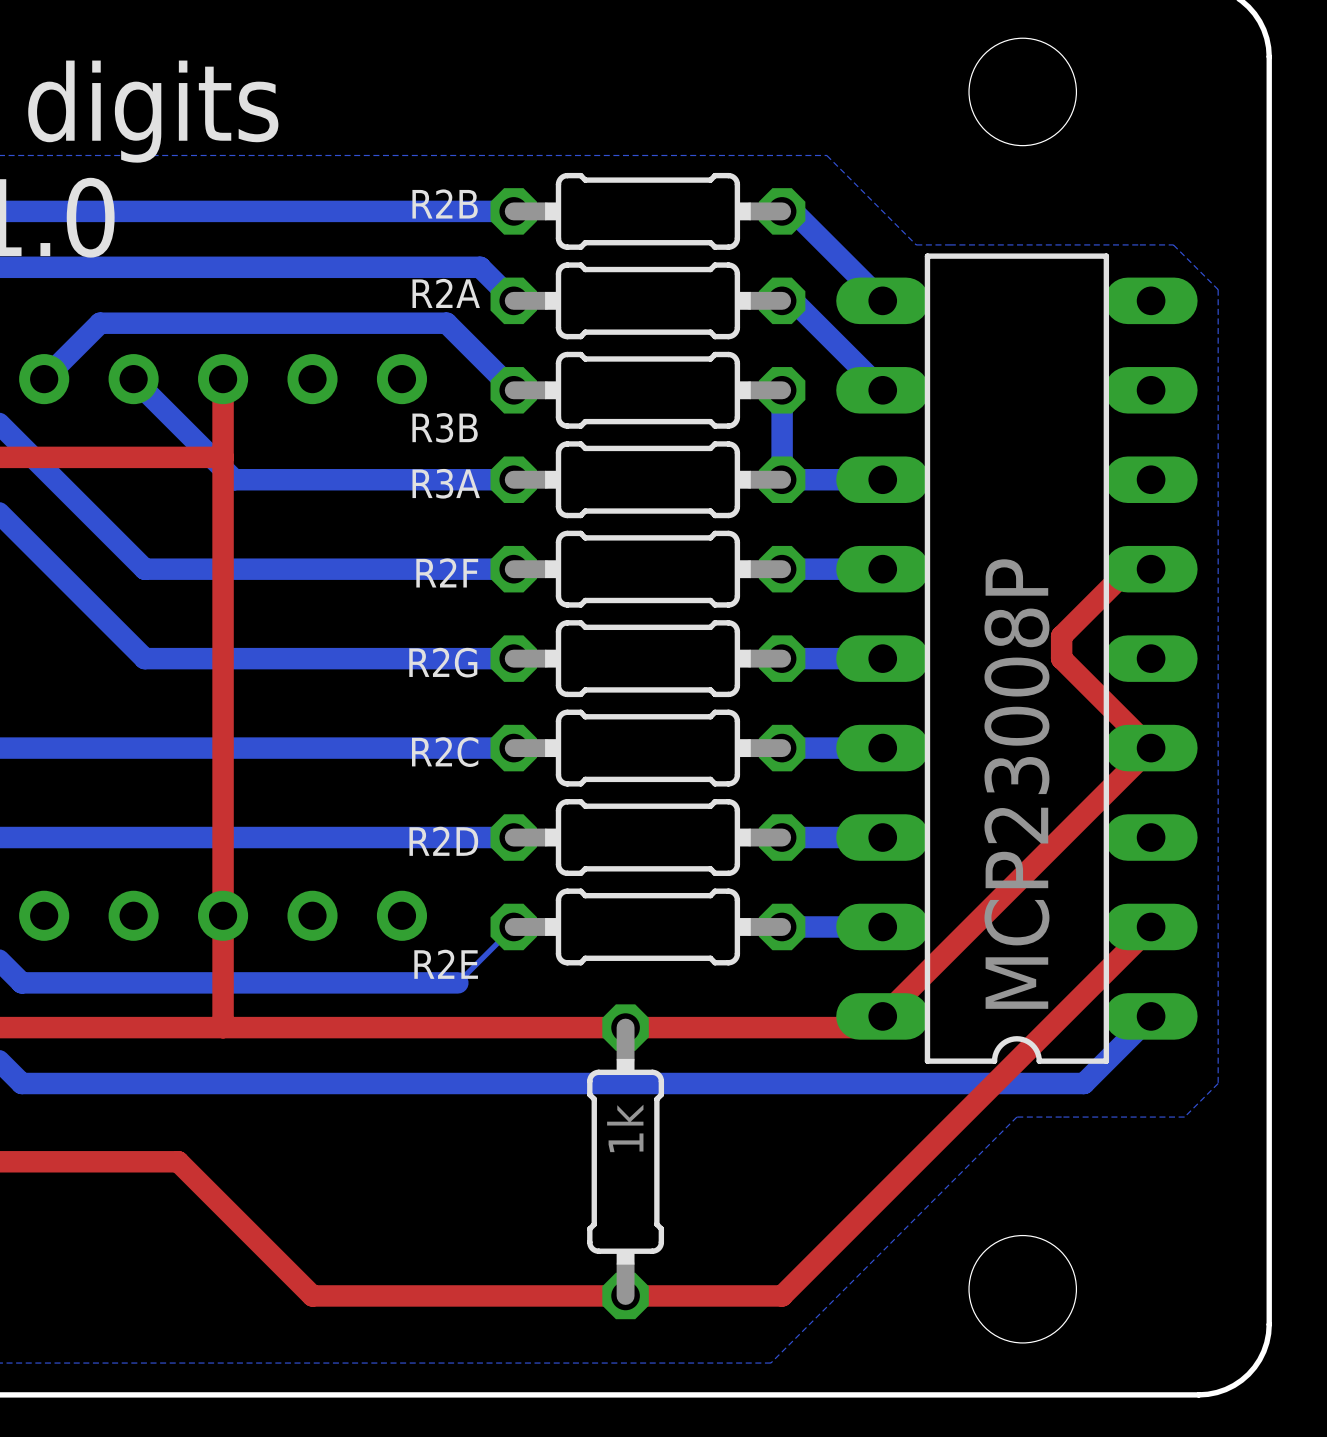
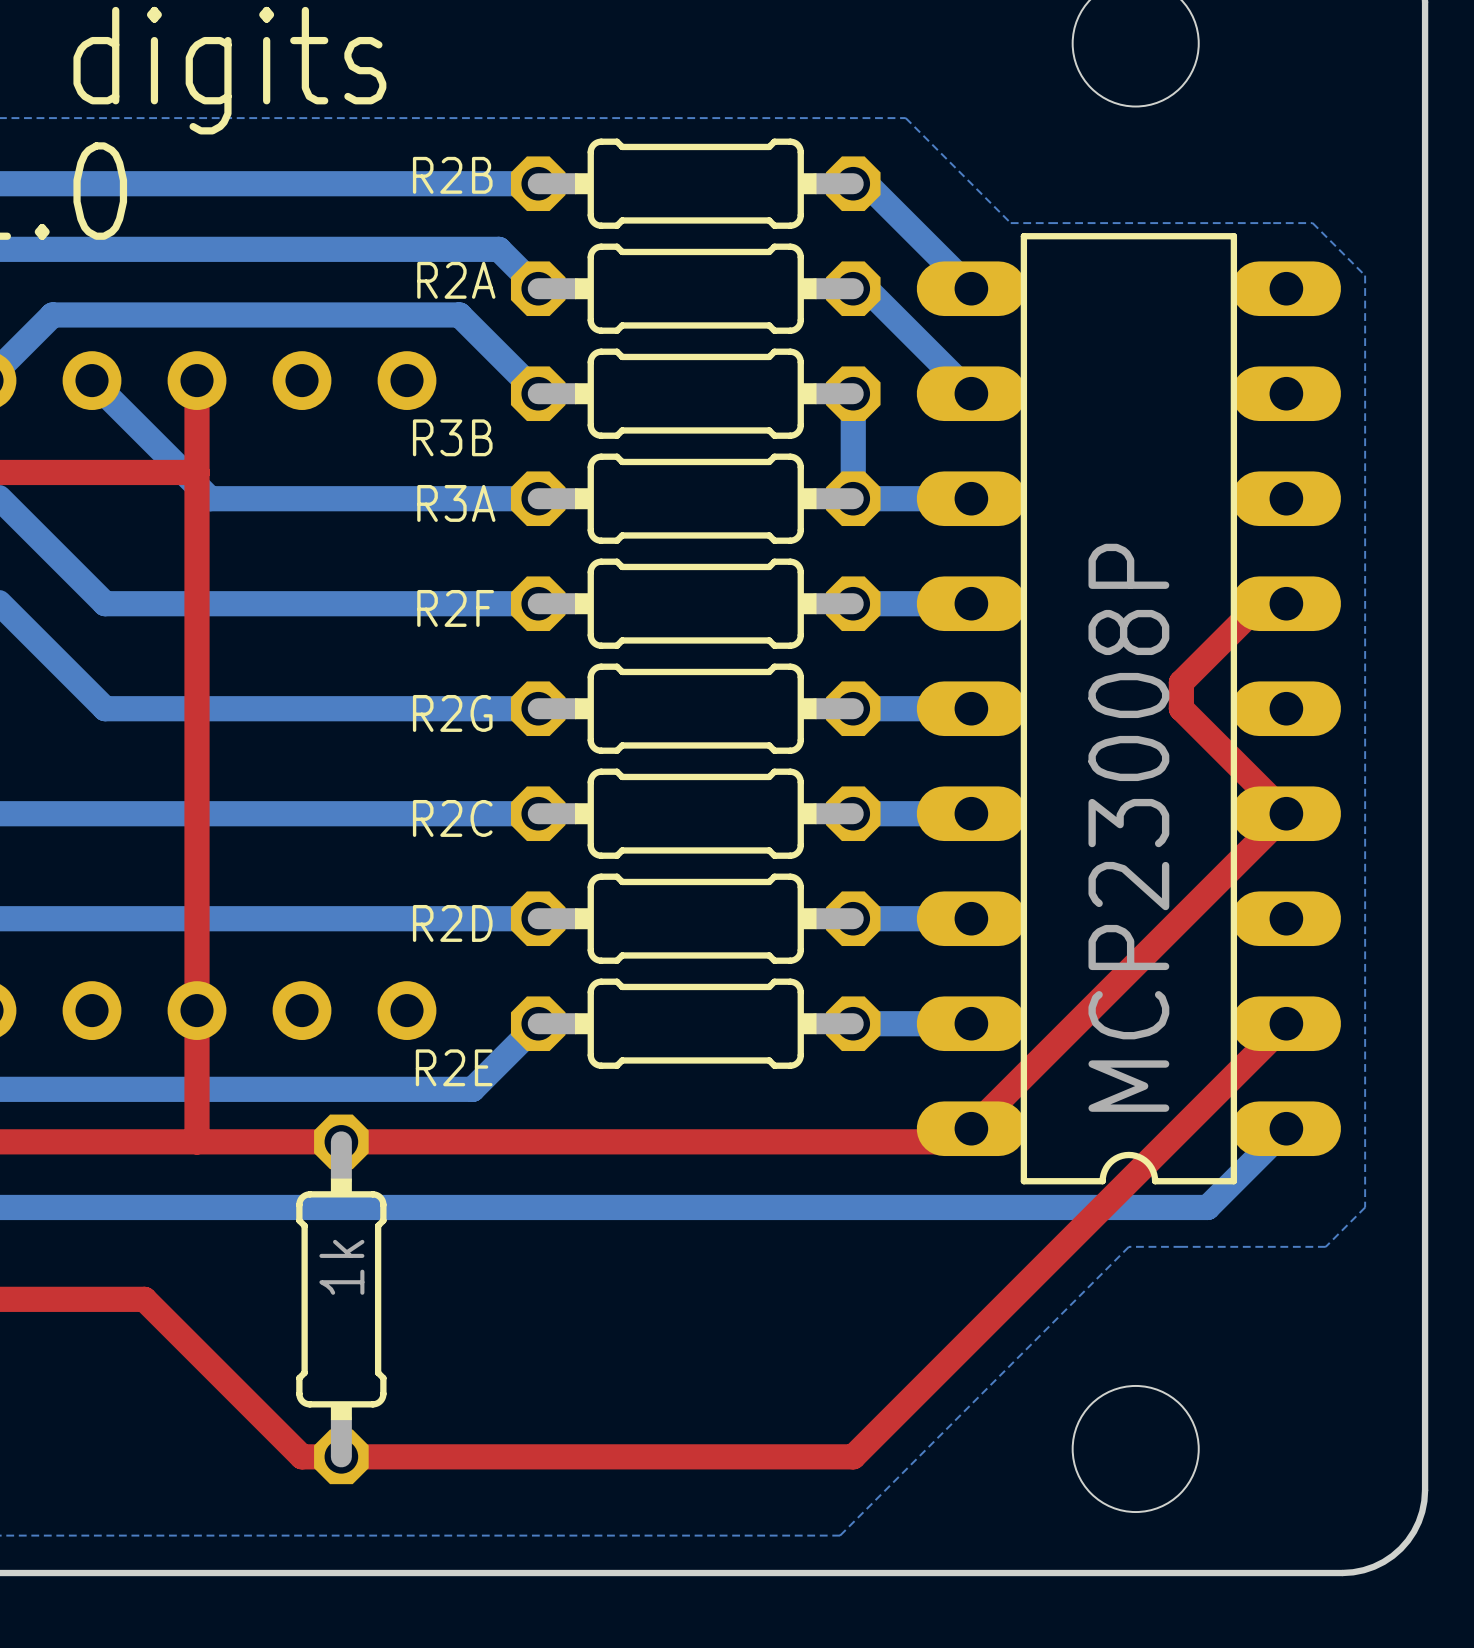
bottom track width: thin (513, 926) (457, 982) -> thick (538, 1023) (472, 1089)
part position: (625, 1161) -> (341, 1299)

